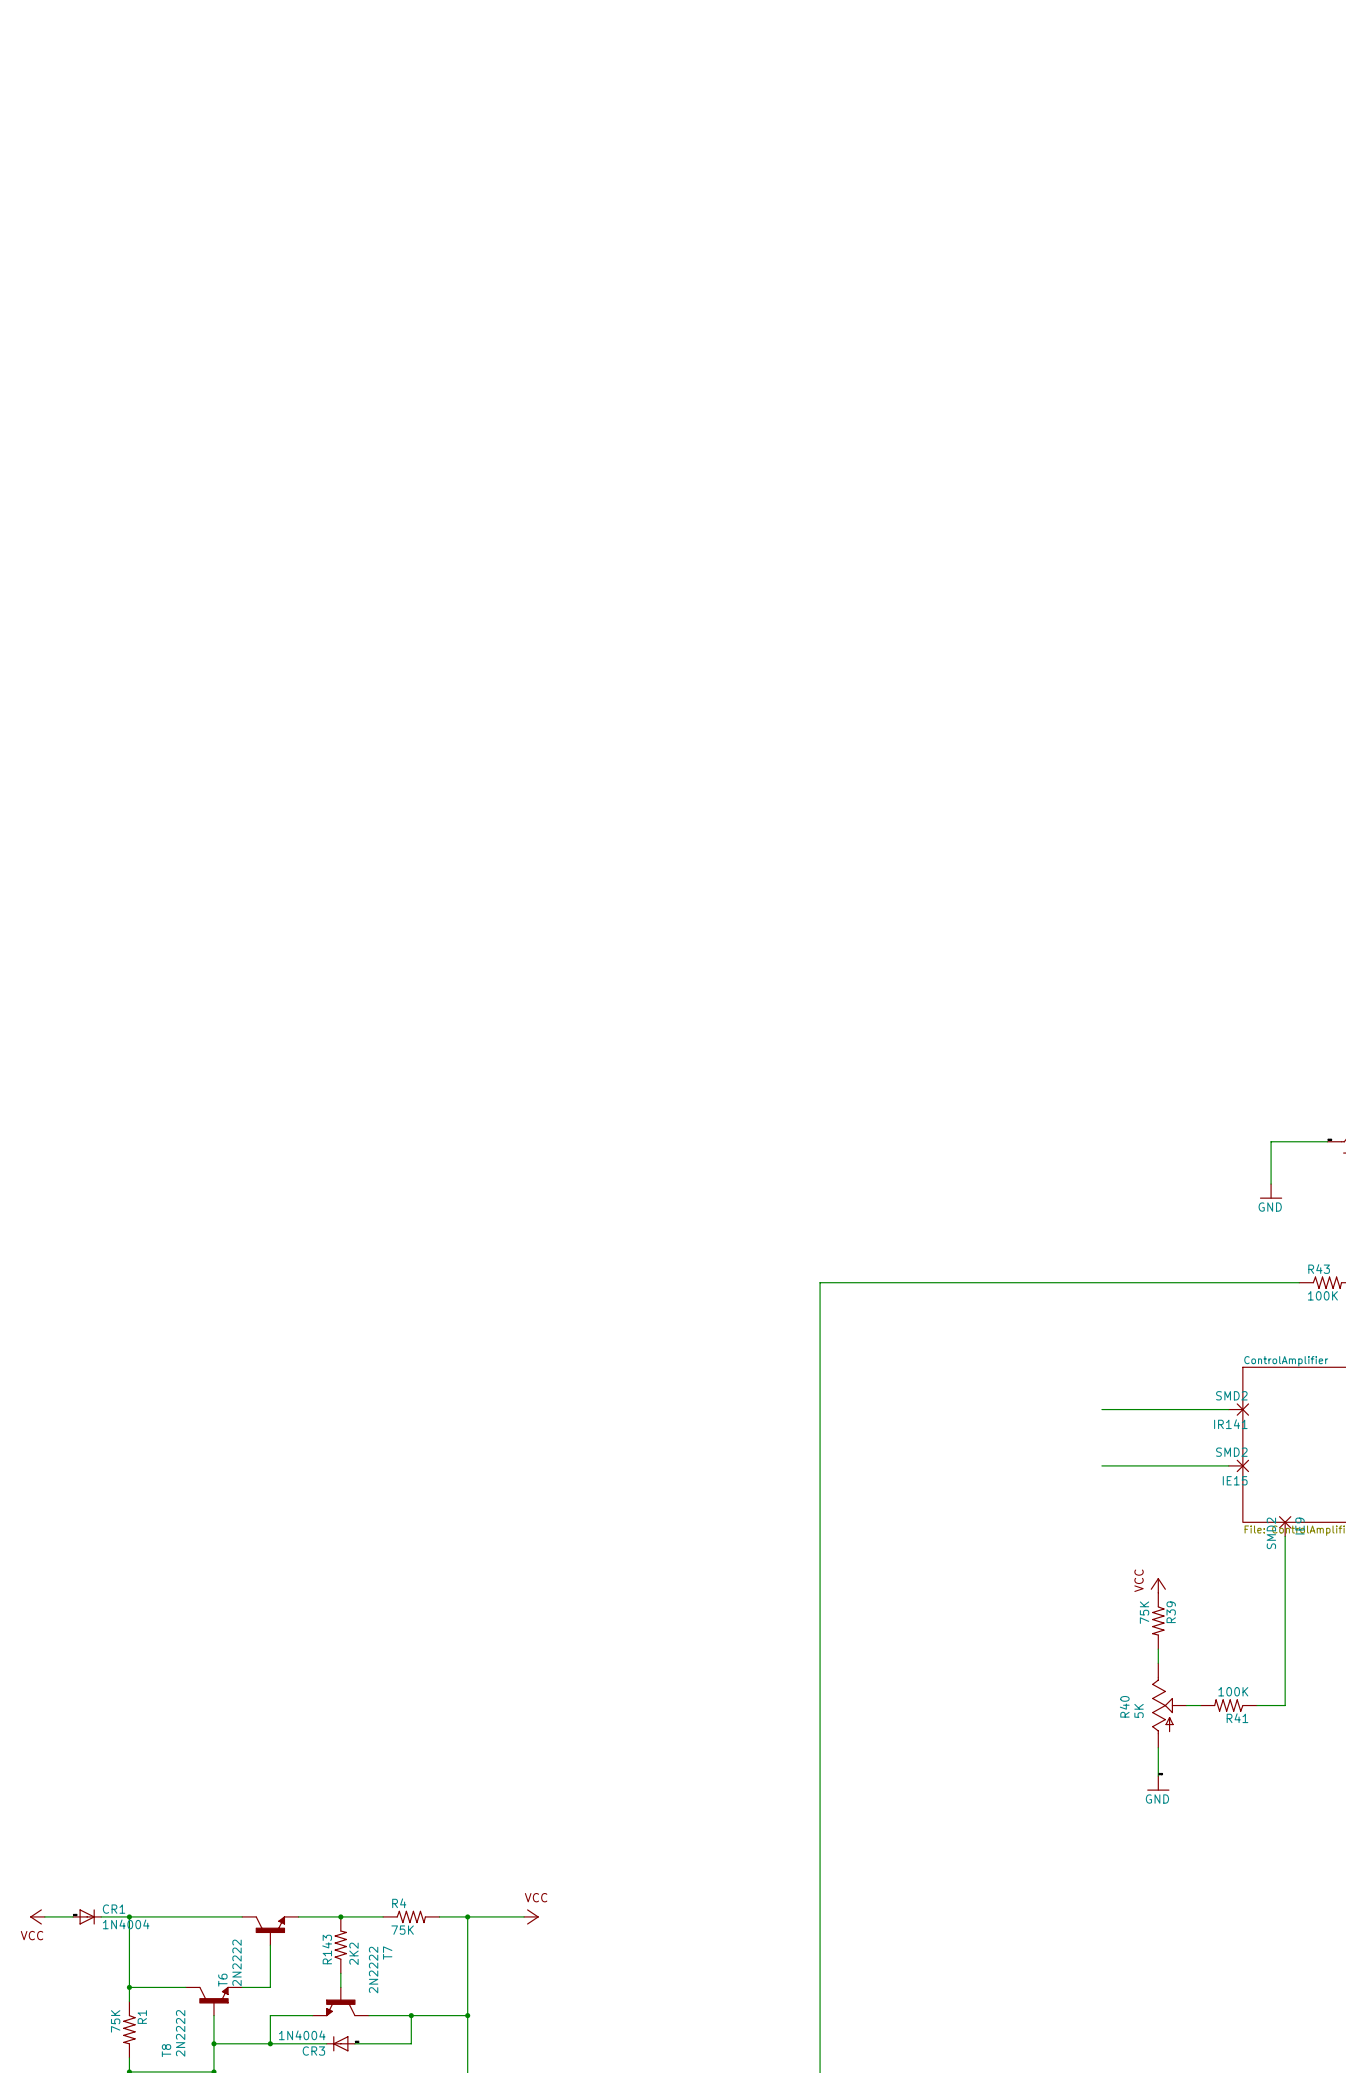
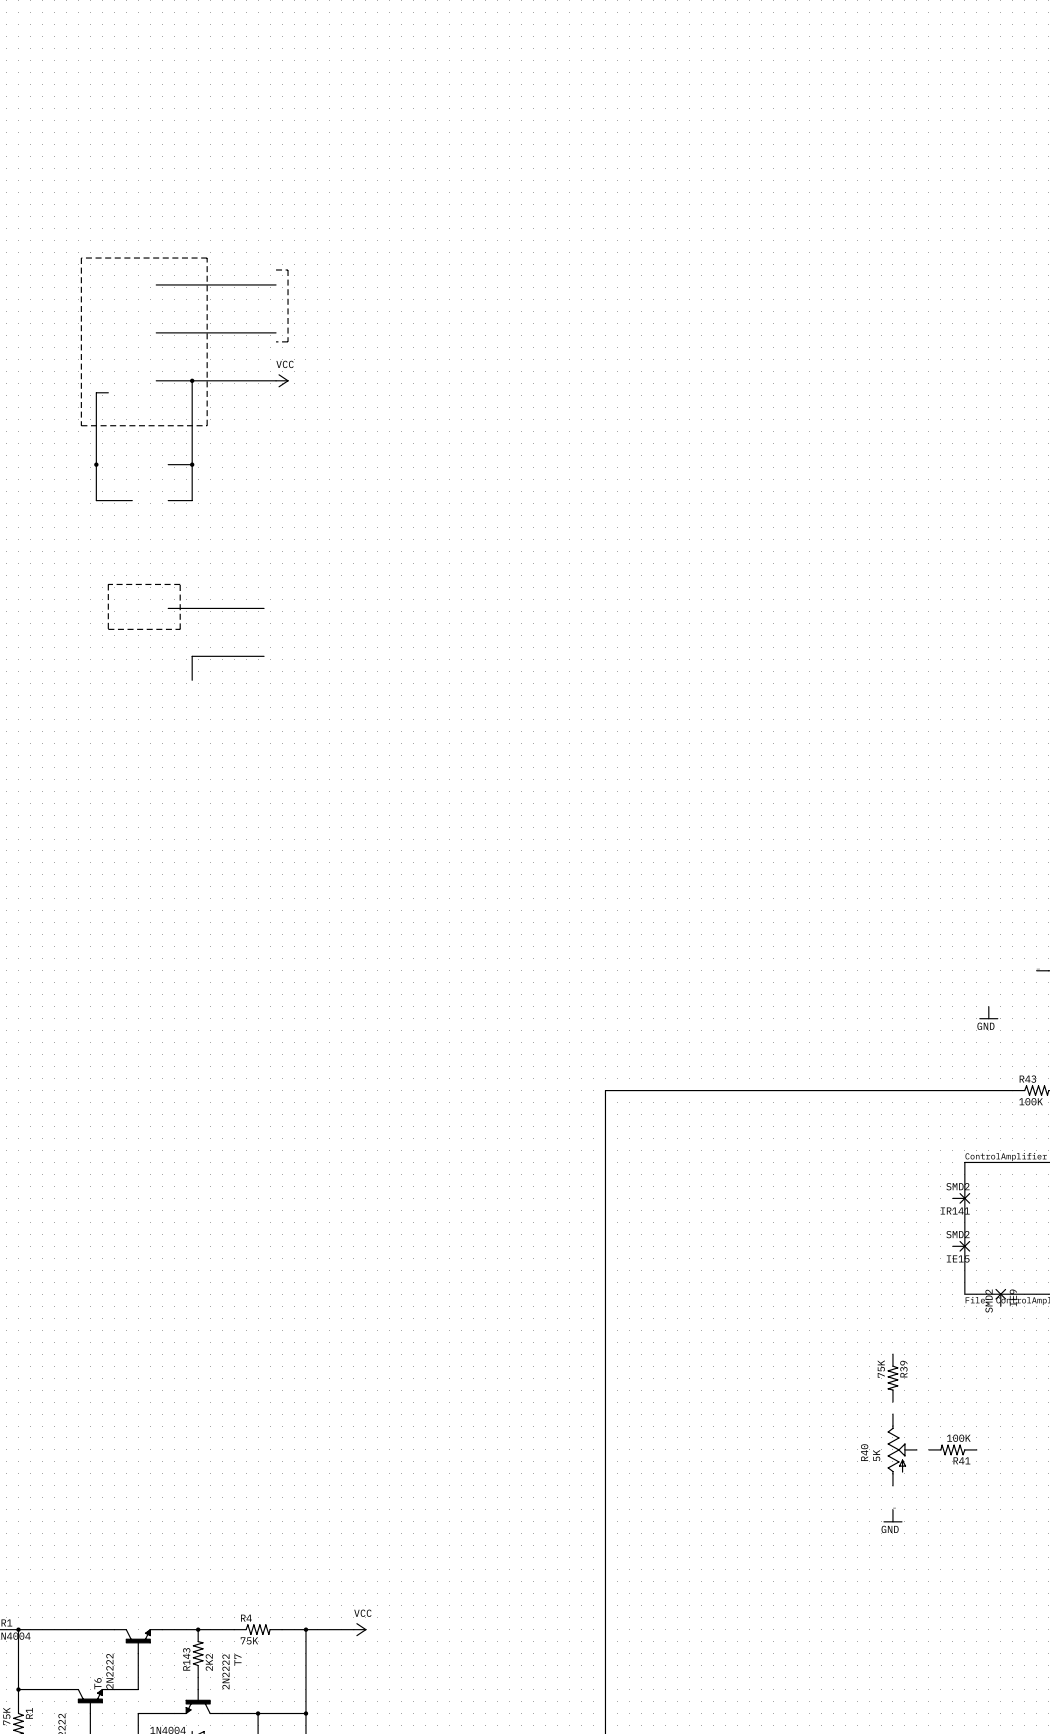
line: none -> (81, 258) (207, 258) (207, 425) (81, 425) (81, 258)
line: none -> (276, 269) (288, 269) (288, 341) (276, 341)
wire: none -> (156, 284) (276, 284)
wire: none -> (156, 332) (276, 332)
wire: none -> (156, 380) (276, 380)
wire: none -> (192, 380) (192, 500) (168, 500)
junction: none -> (192, 380)
power symbol: none -> (282, 380)
wire: none -> (108, 392) (96, 392) (96, 500) (132, 500)
junction: none -> (96, 464)
wire: none -> (168, 464) (192, 464)
junction: none -> (192, 464)
line: none -> (108, 584) (180, 584) (180, 629) (108, 629) (108, 584)
wire: none -> (168, 608) (264, 608)
wire: none -> (264, 656) (192, 656) (192, 680)
wire: (1327, 1141) (1271, 1141) (1271, 1184) -> none
wire: (1101, 1409) (1228, 1409) -> none
wire: (1101, 1465) (1228, 1465) -> none
wire: (1285, 1536) (1285, 1705) (1256, 1705) -> none
power symbol: (1158, 1585) -> none
wire: (1158, 1649) (1158, 1663) -> none
wire: (1186, 1705) (1200, 1705) -> none
wire: (1158, 1747) (1158, 1776) -> none

